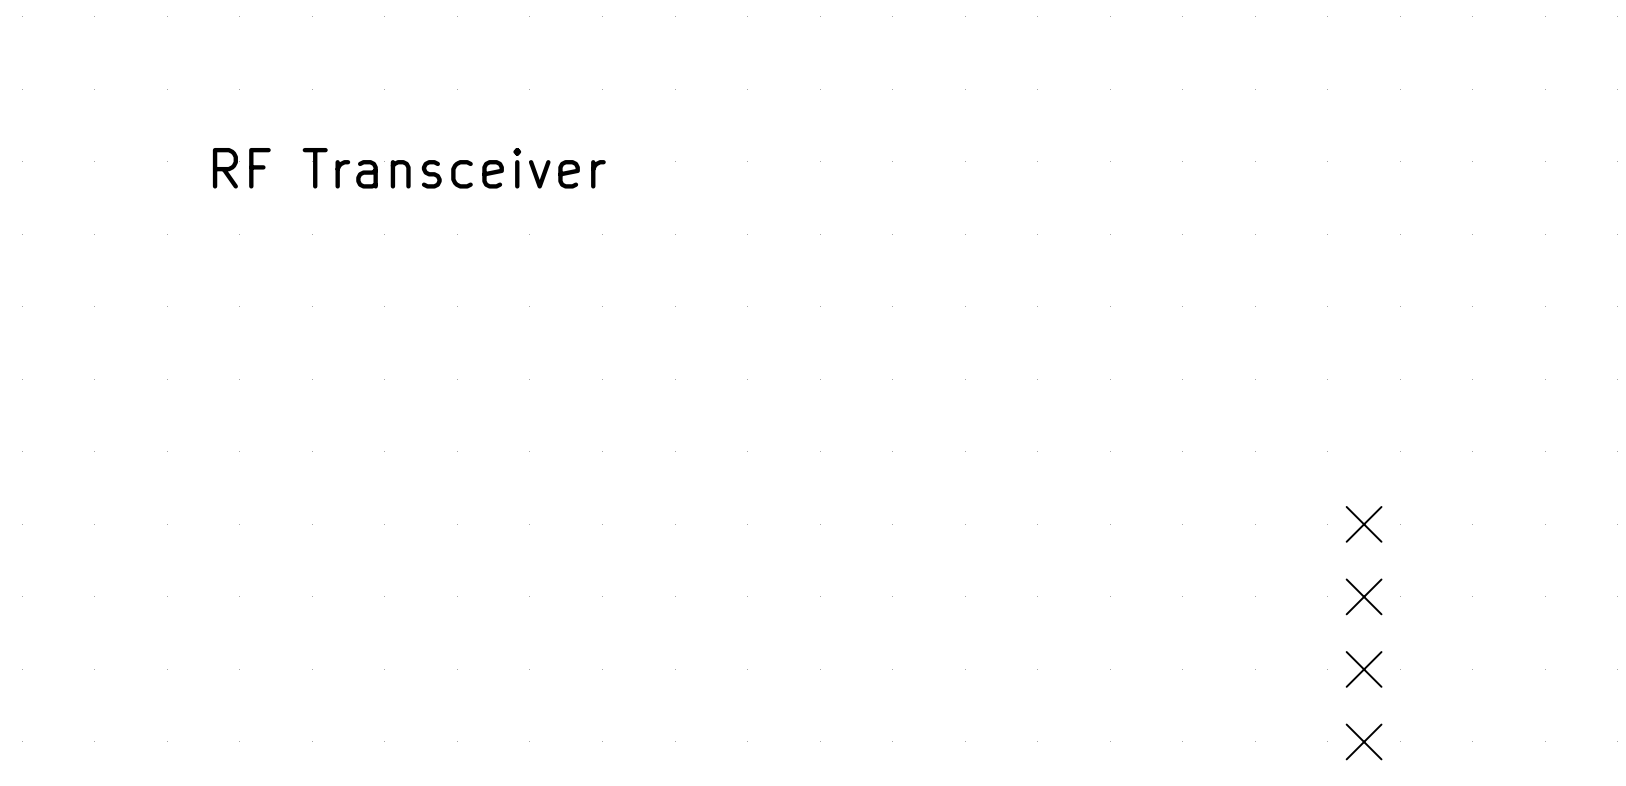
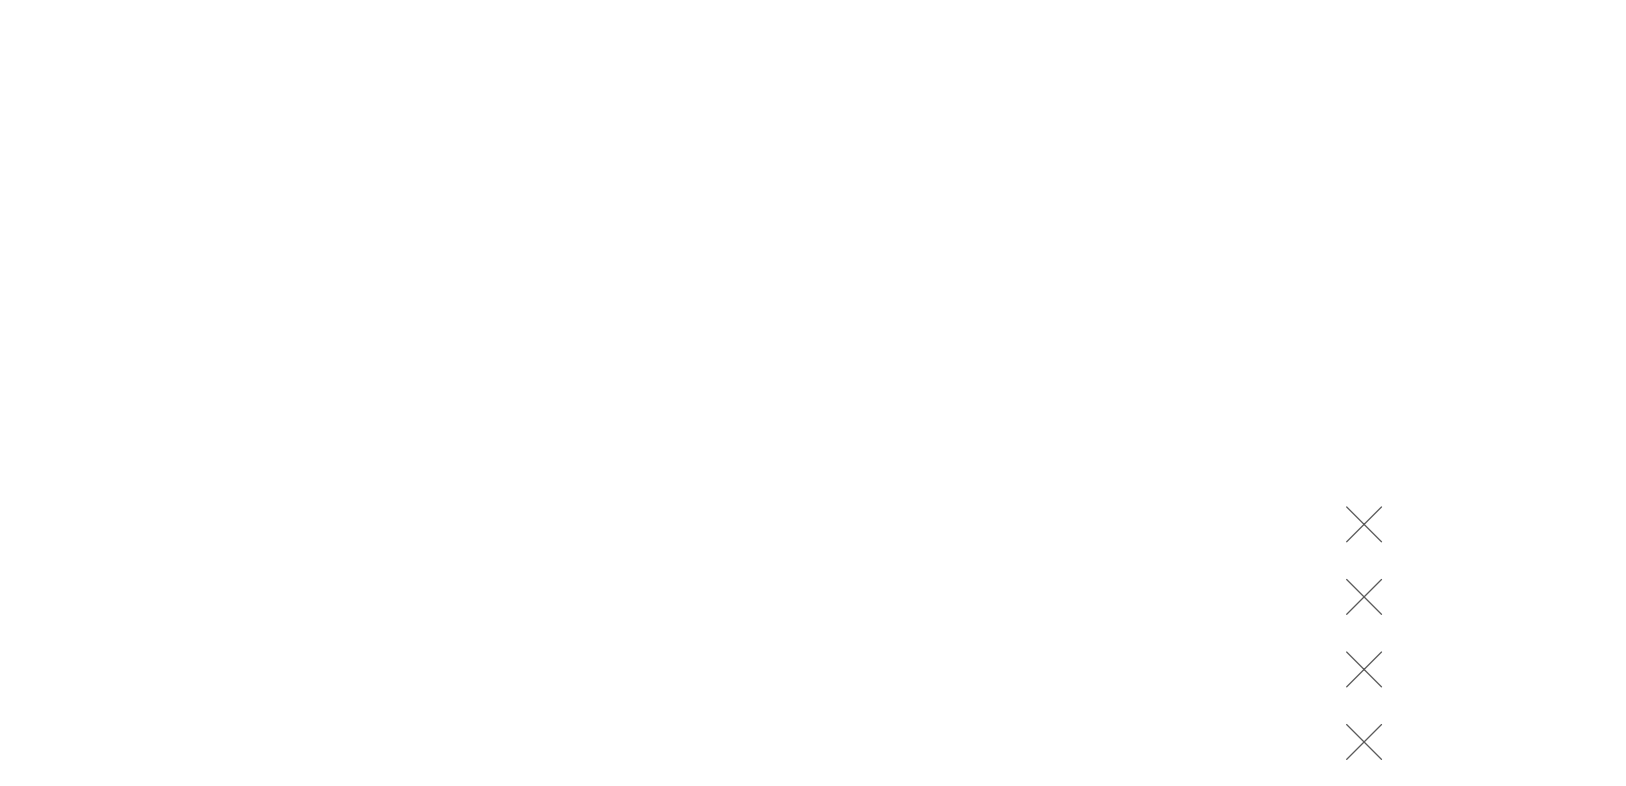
text: RF Transceiver (409, 168) -> none

